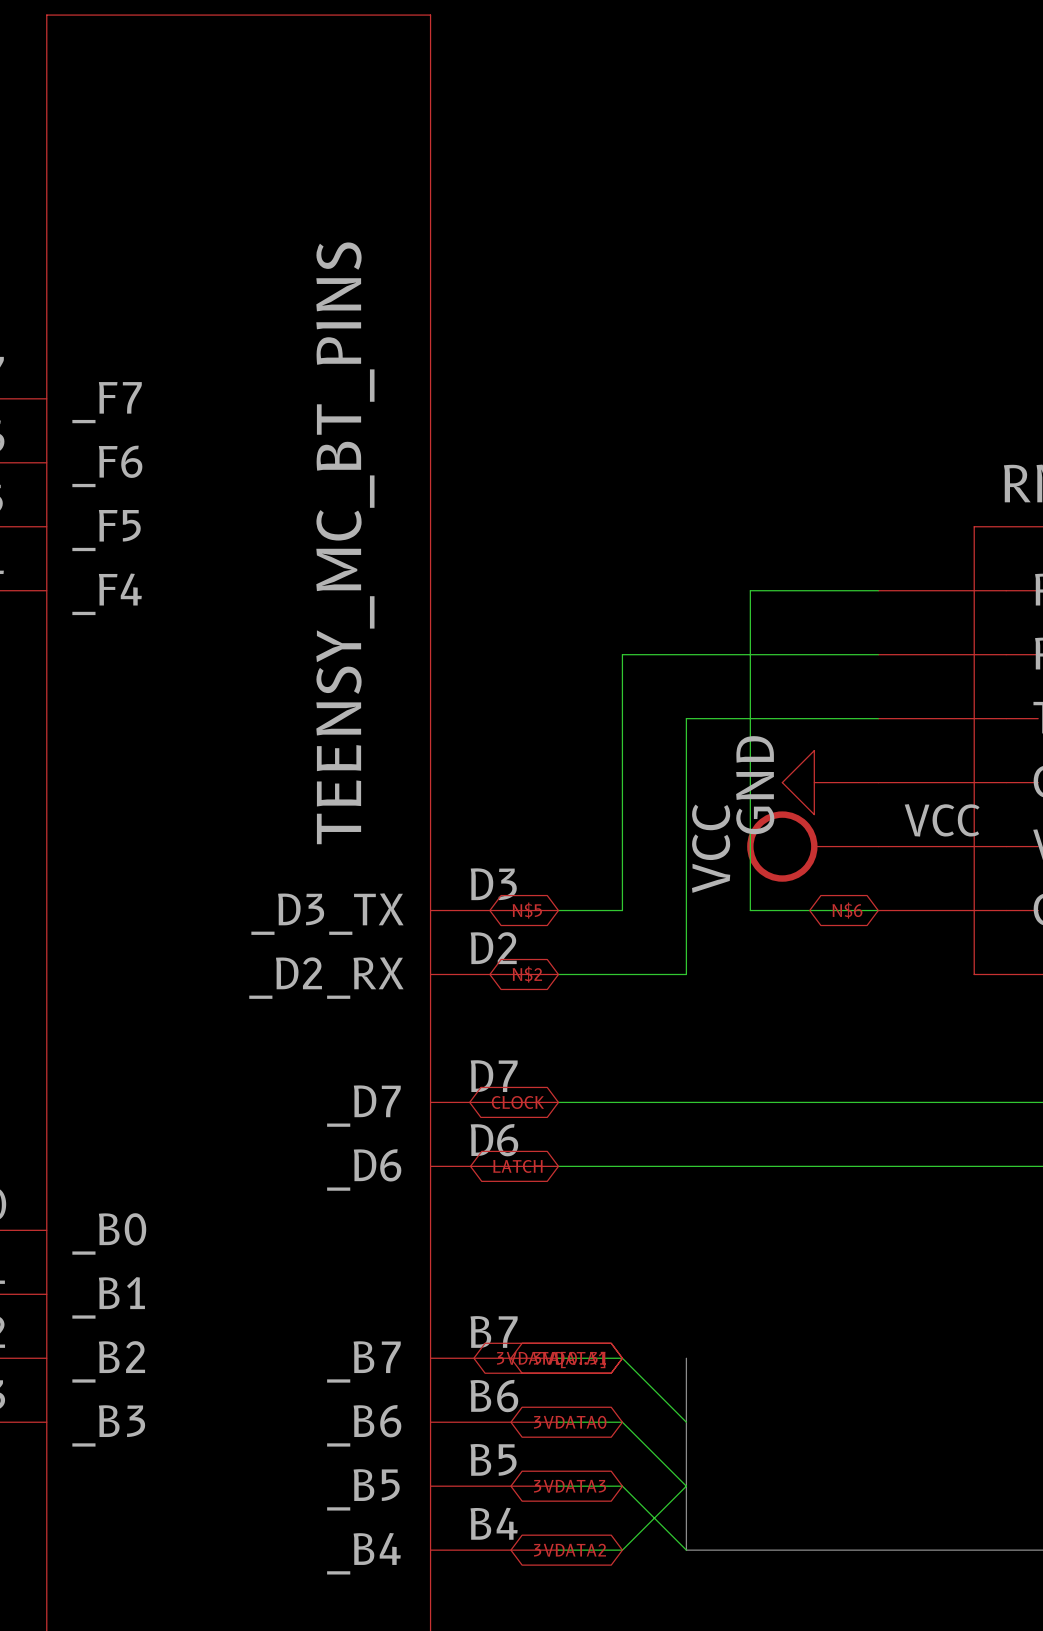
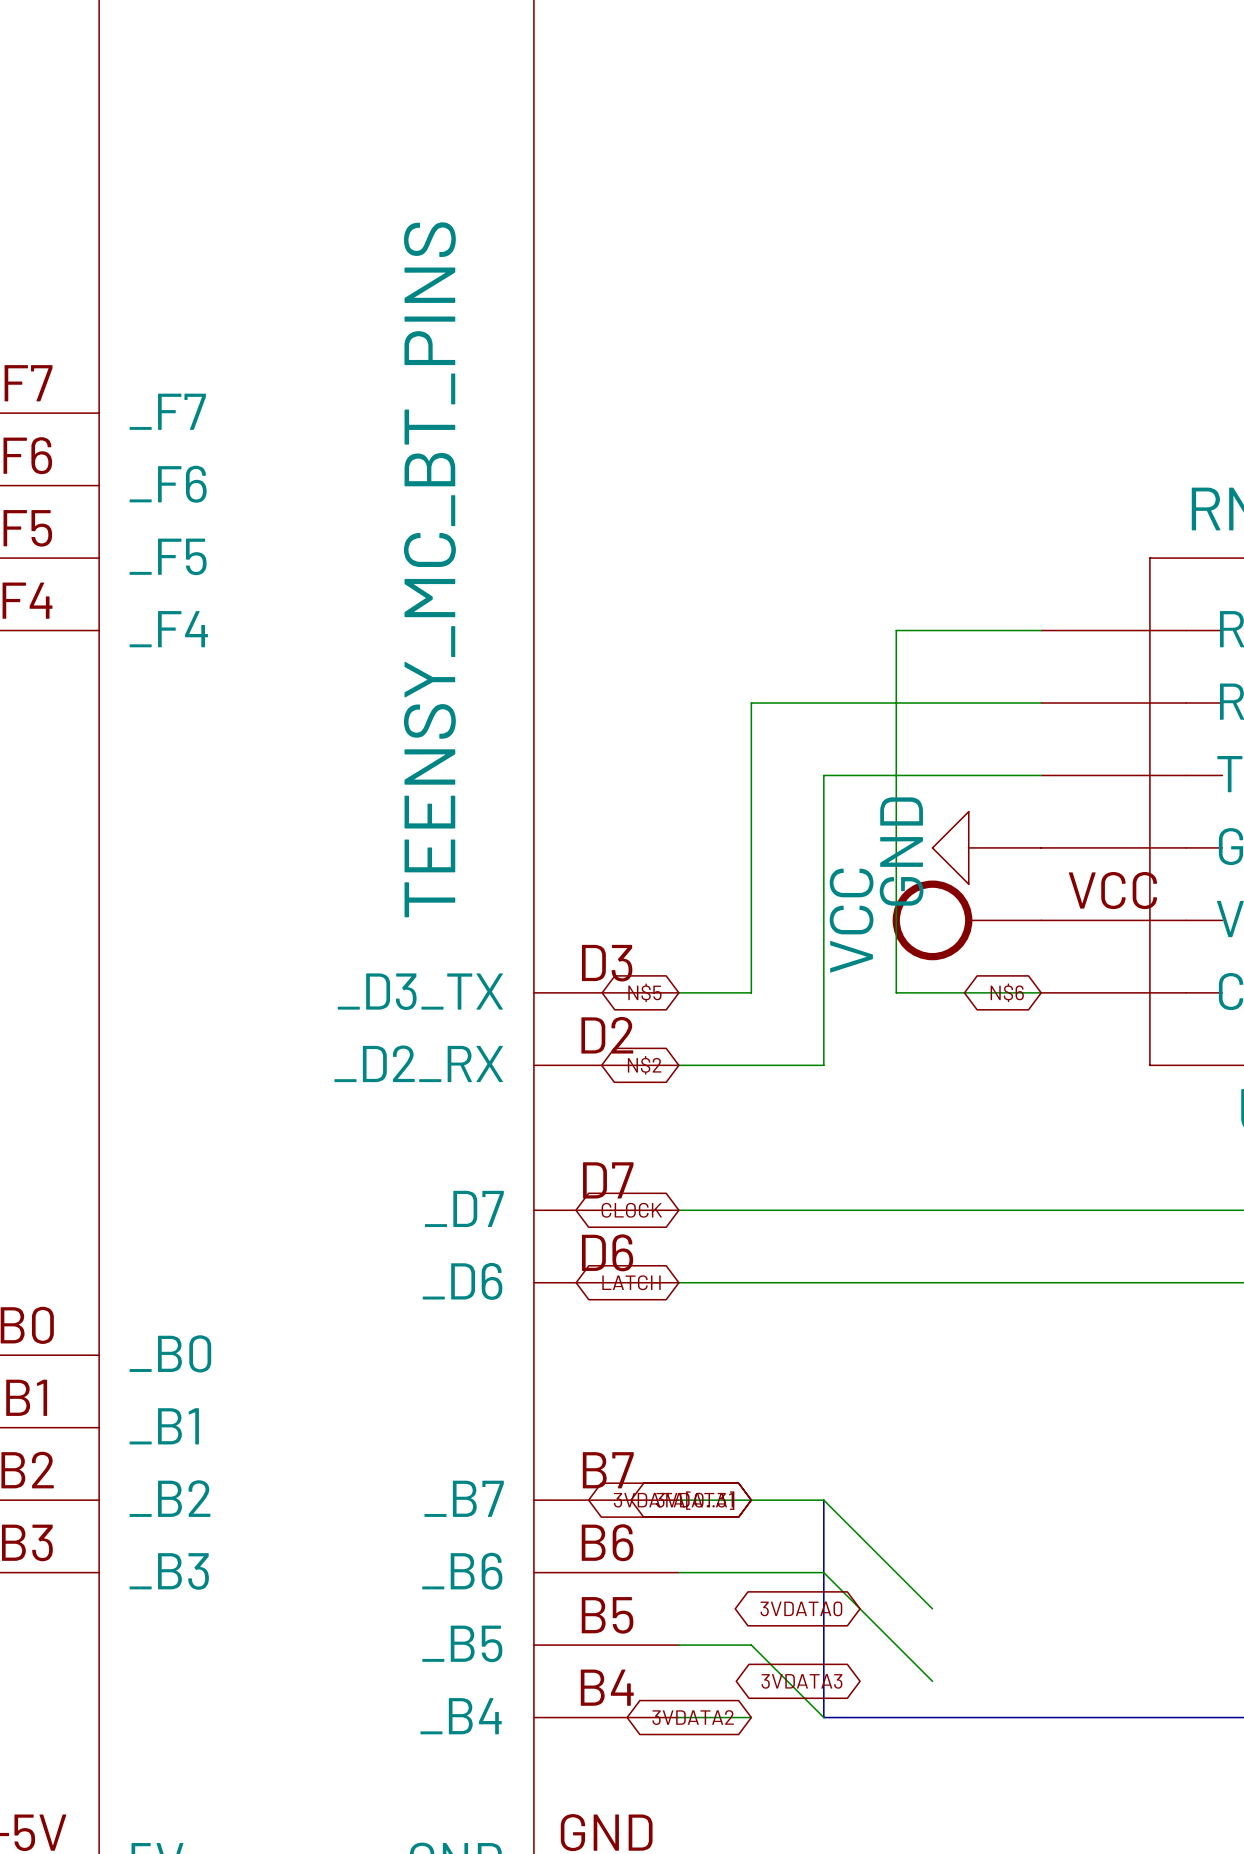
wire: (622, 1358) (686, 1422) -> (751, 1500) (823, 1500) (932, 1608)
global label position: 3VDATA0 (570, 1422) -> 3VDATA0 (801, 1608)
wire: (622, 1422) (686, 1486) (622, 1550) -> (751, 1572) (823, 1572) (932, 1681)
global label position: 3VDATA3 (569, 1486) -> 3VDATA3 (801, 1681)

